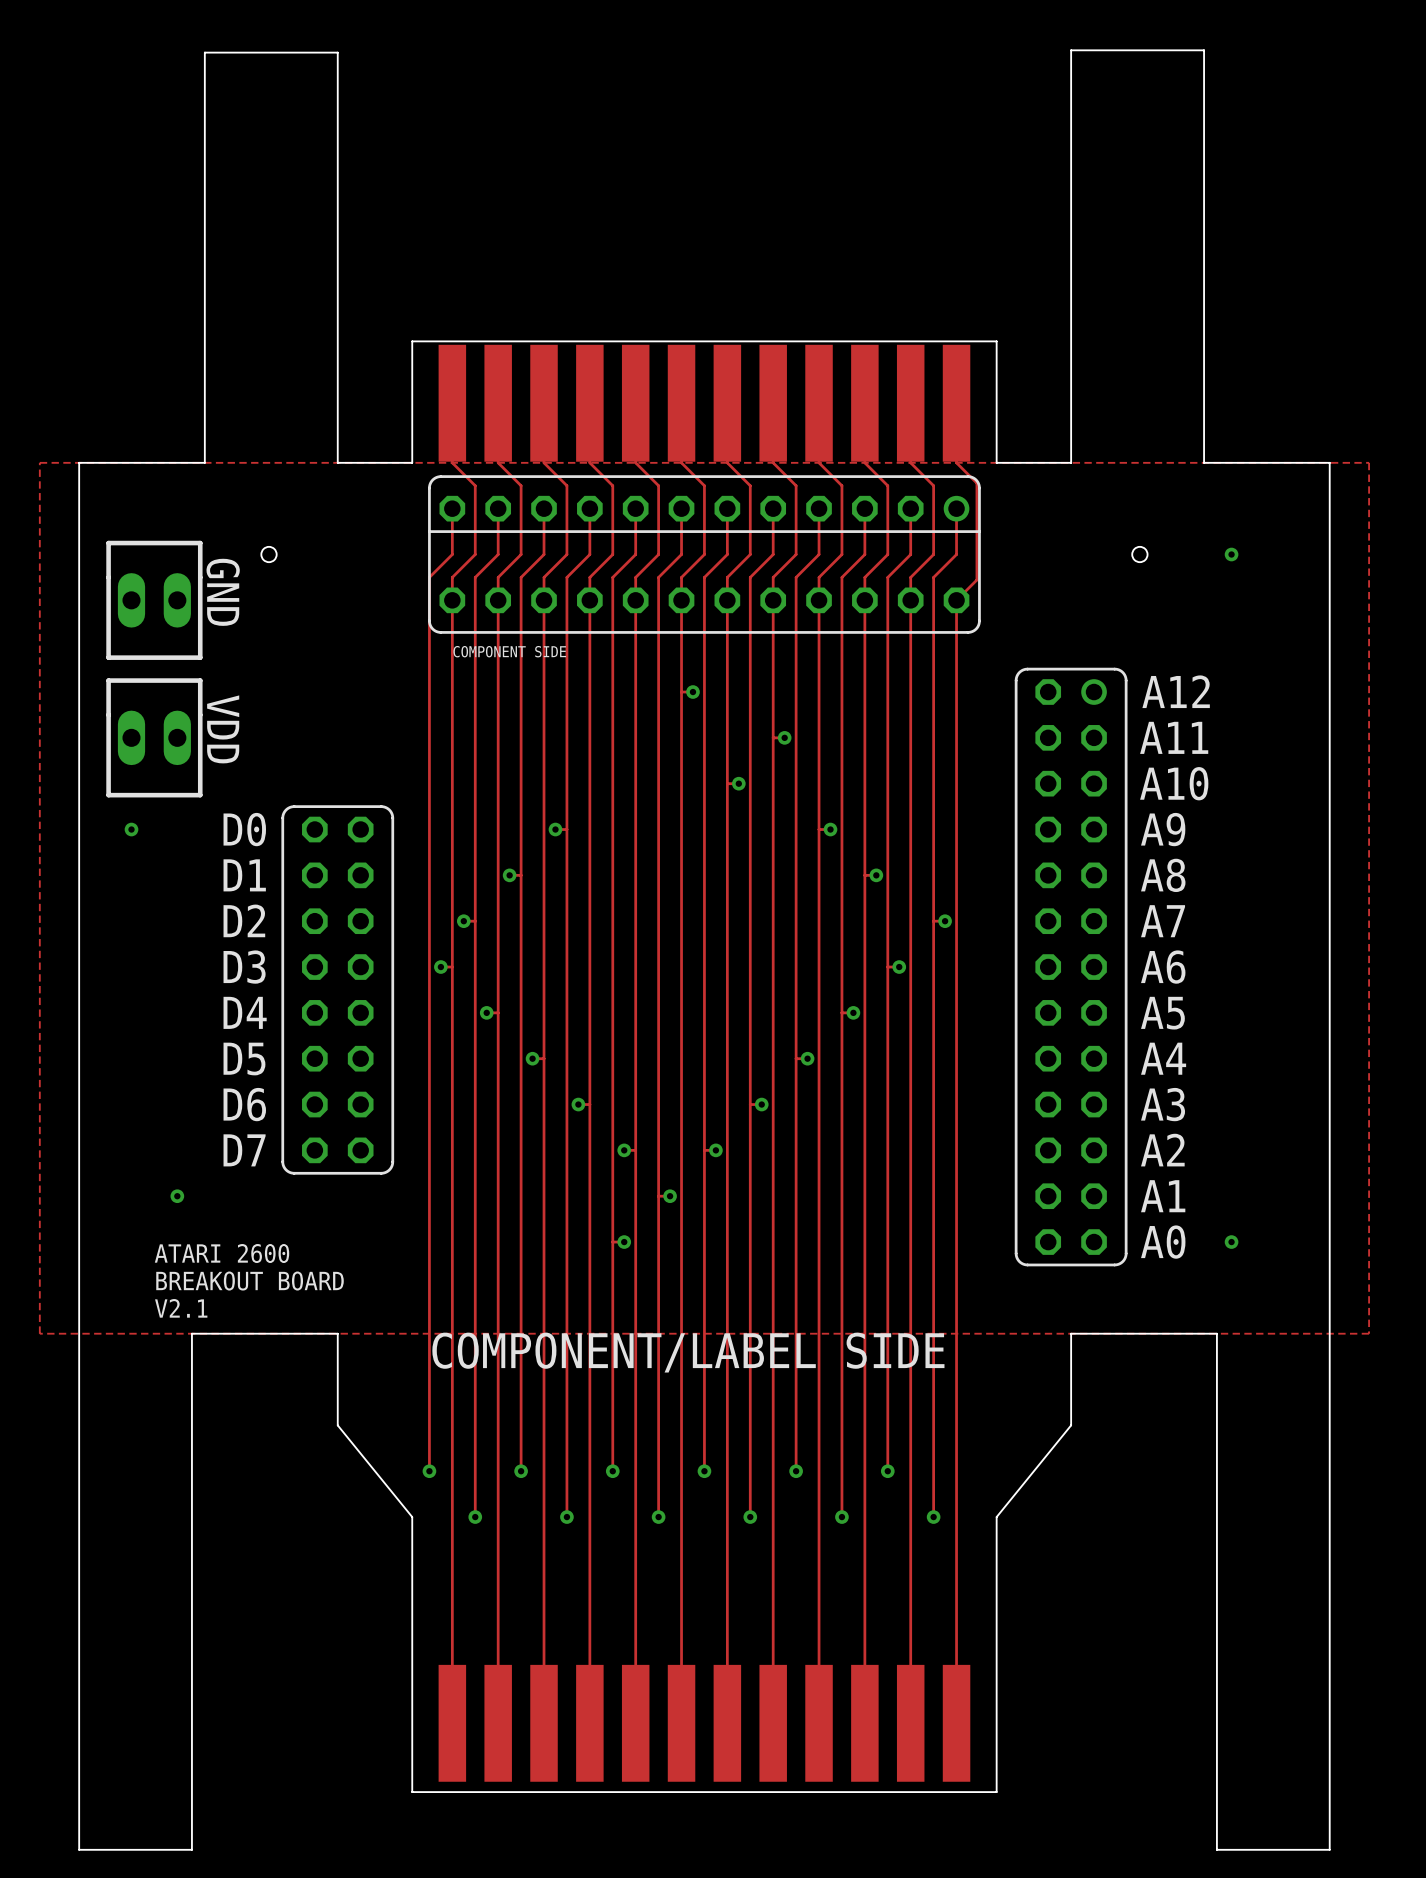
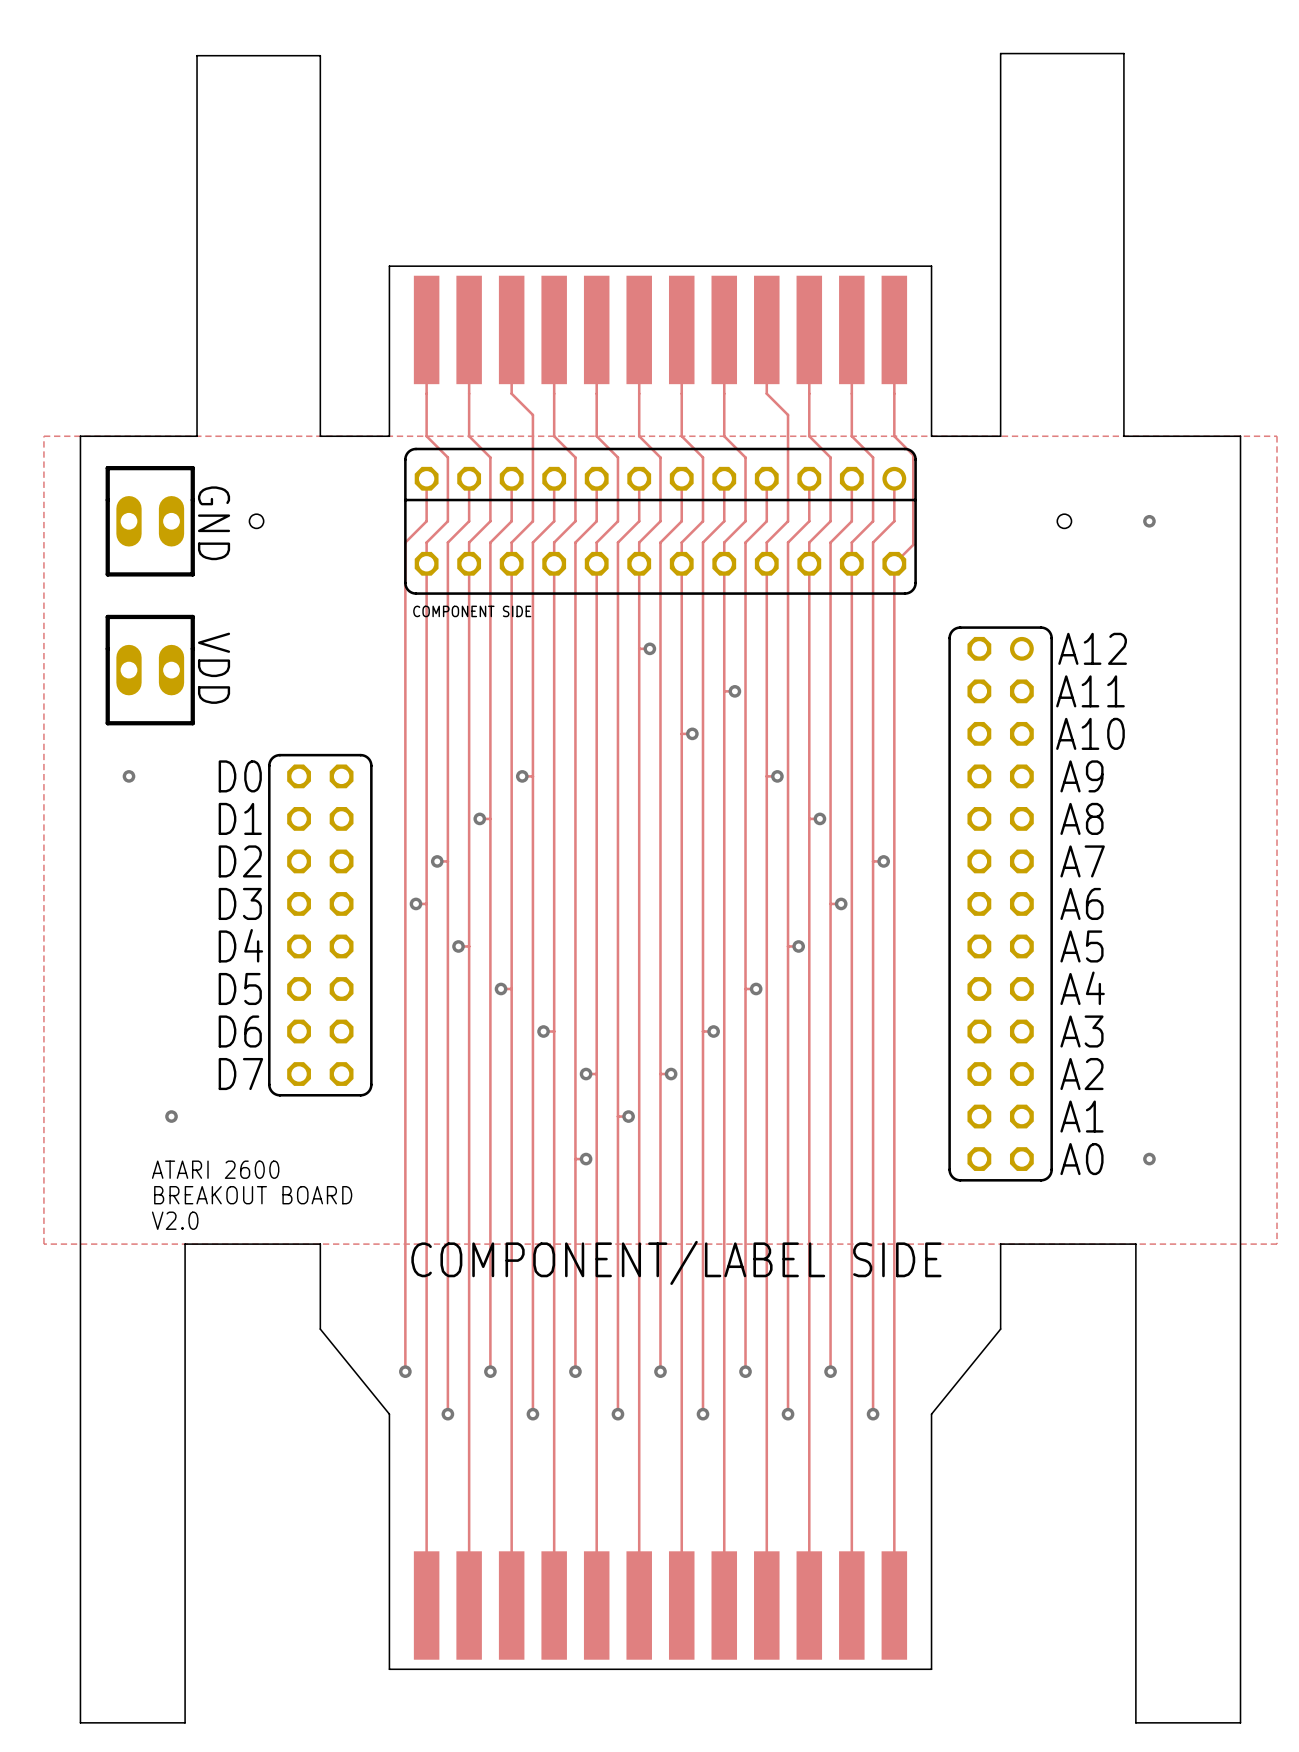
part footprint: [79, 50, 1330, 1850] -> [80, 53, 1241, 1723]
track: (544, 417) (544, 462) (566, 485) -> (511, 393) (532, 414) (532, 457)
track: (819, 417) (819, 462) (841, 485) -> (766, 393) (788, 414) (788, 457)
text position: GND (223, 592) -> GND (214, 523)
part position: (154, 600) -> (150, 521)
text position: VDD (223, 729) -> VDD (214, 668)
part position: (154, 737) -> (150, 670)
text: V2.1 (181, 1308) -> V2.0 (175, 1220)

